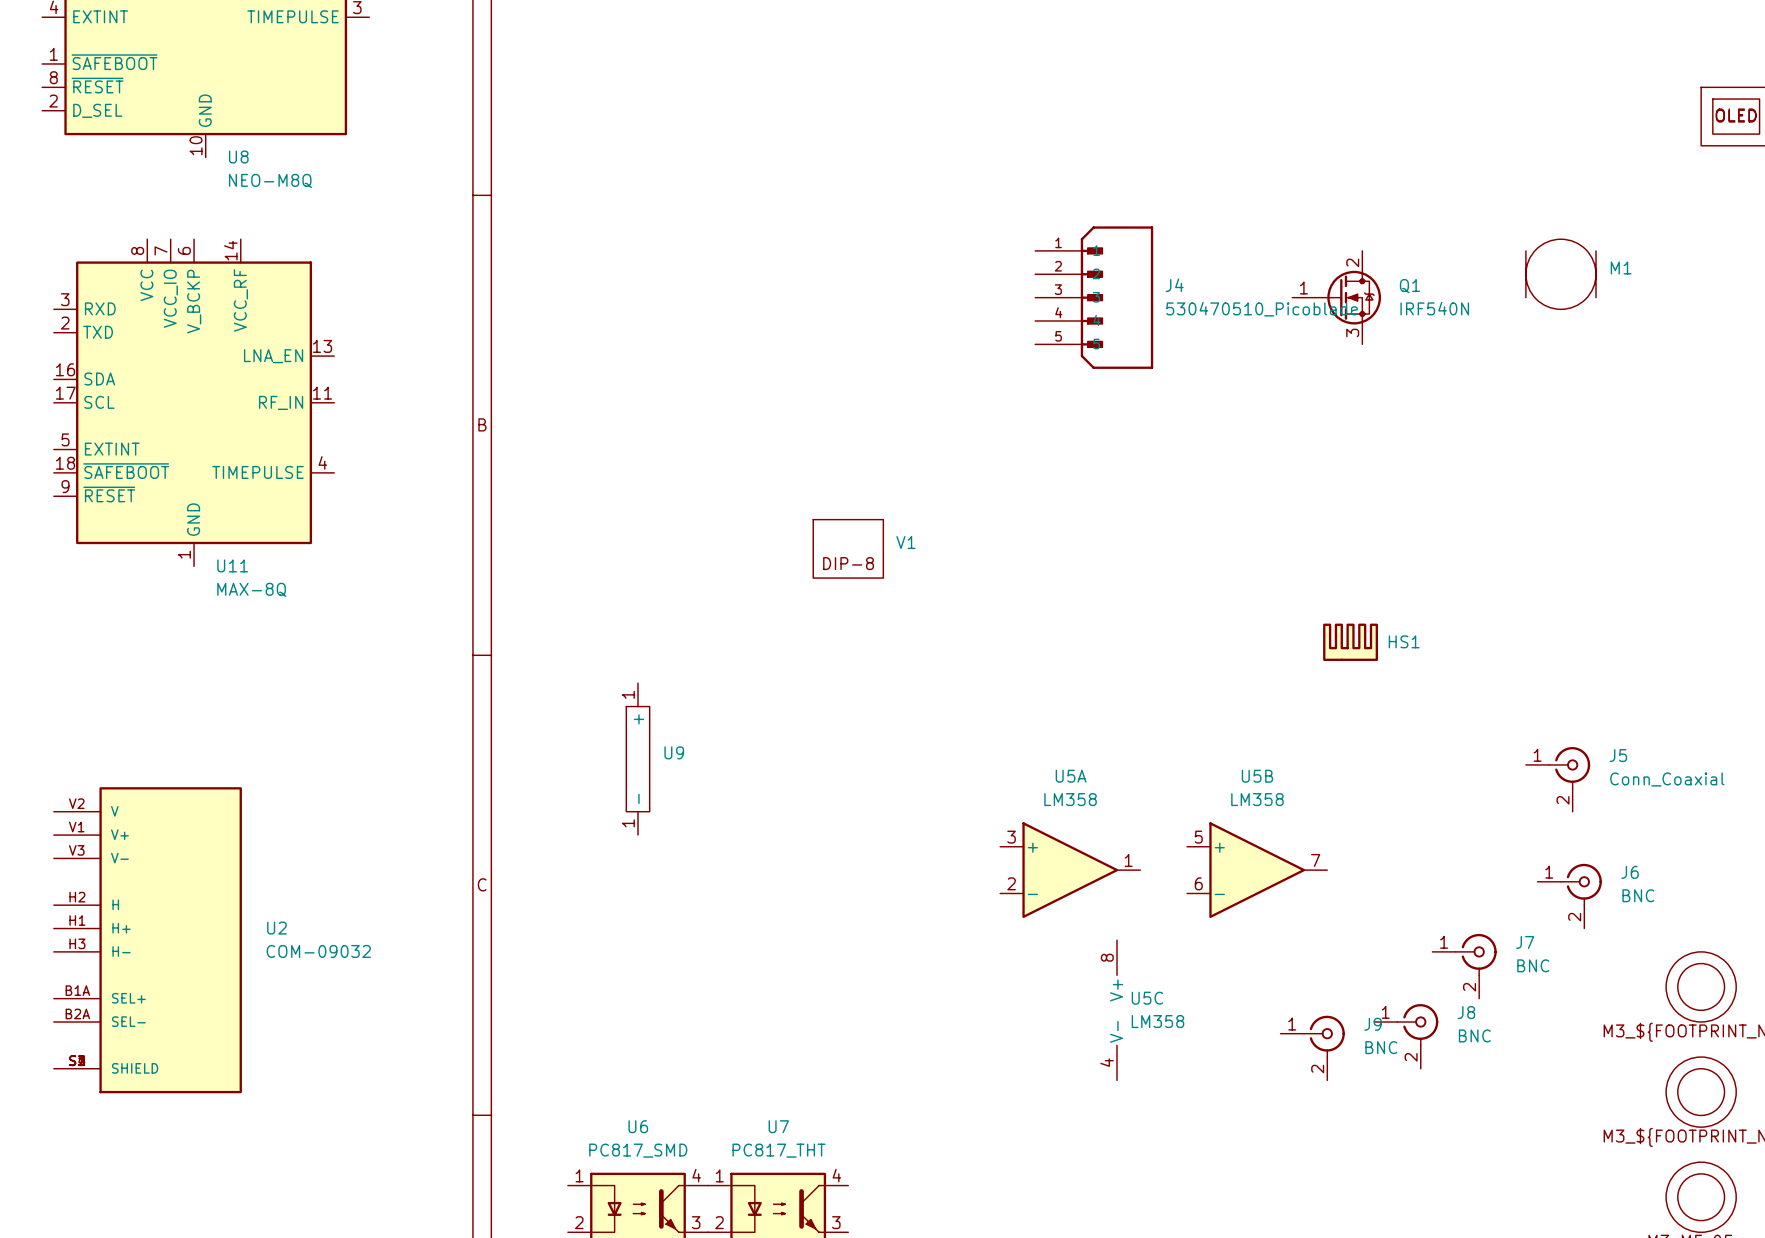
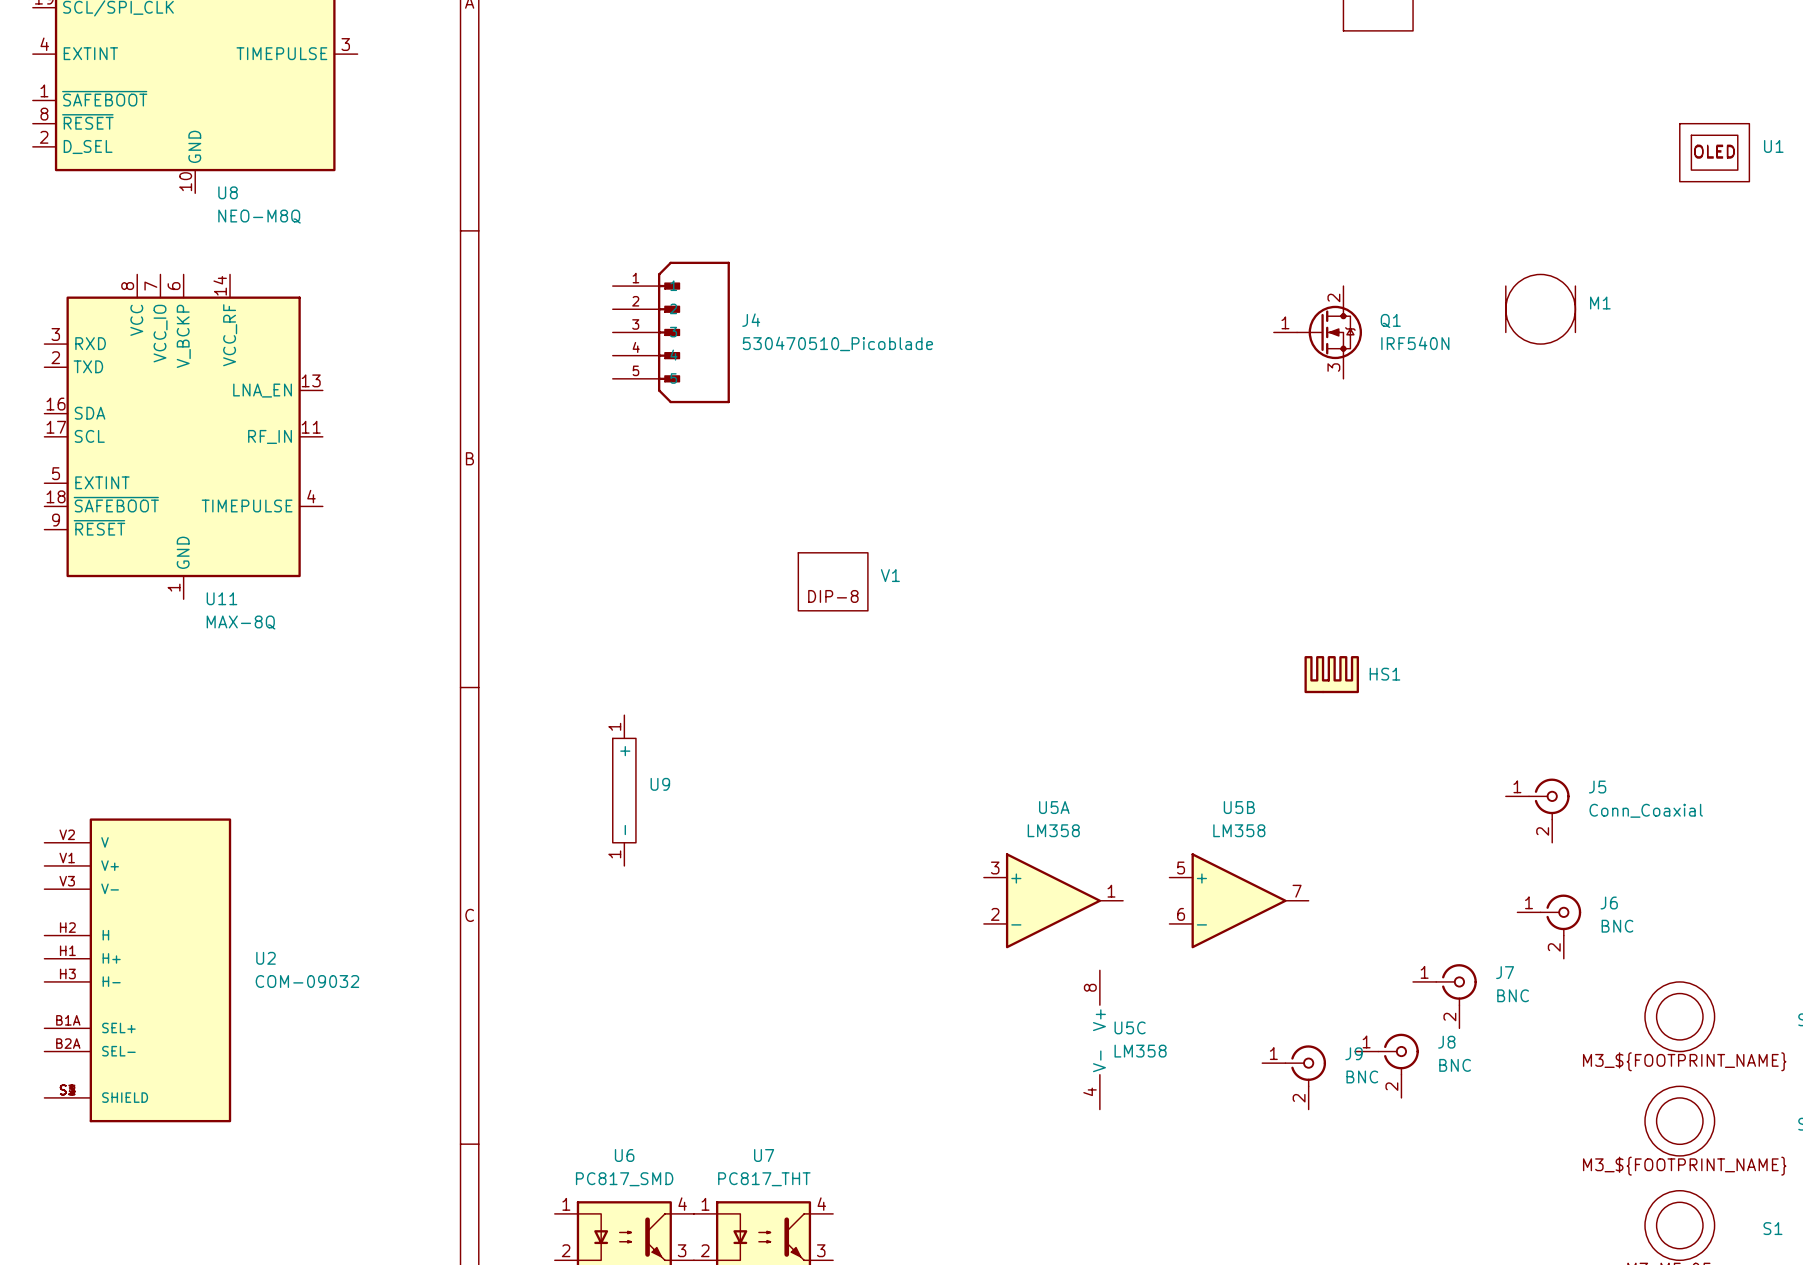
J4 position: (1094, 297) -> (671, 332)

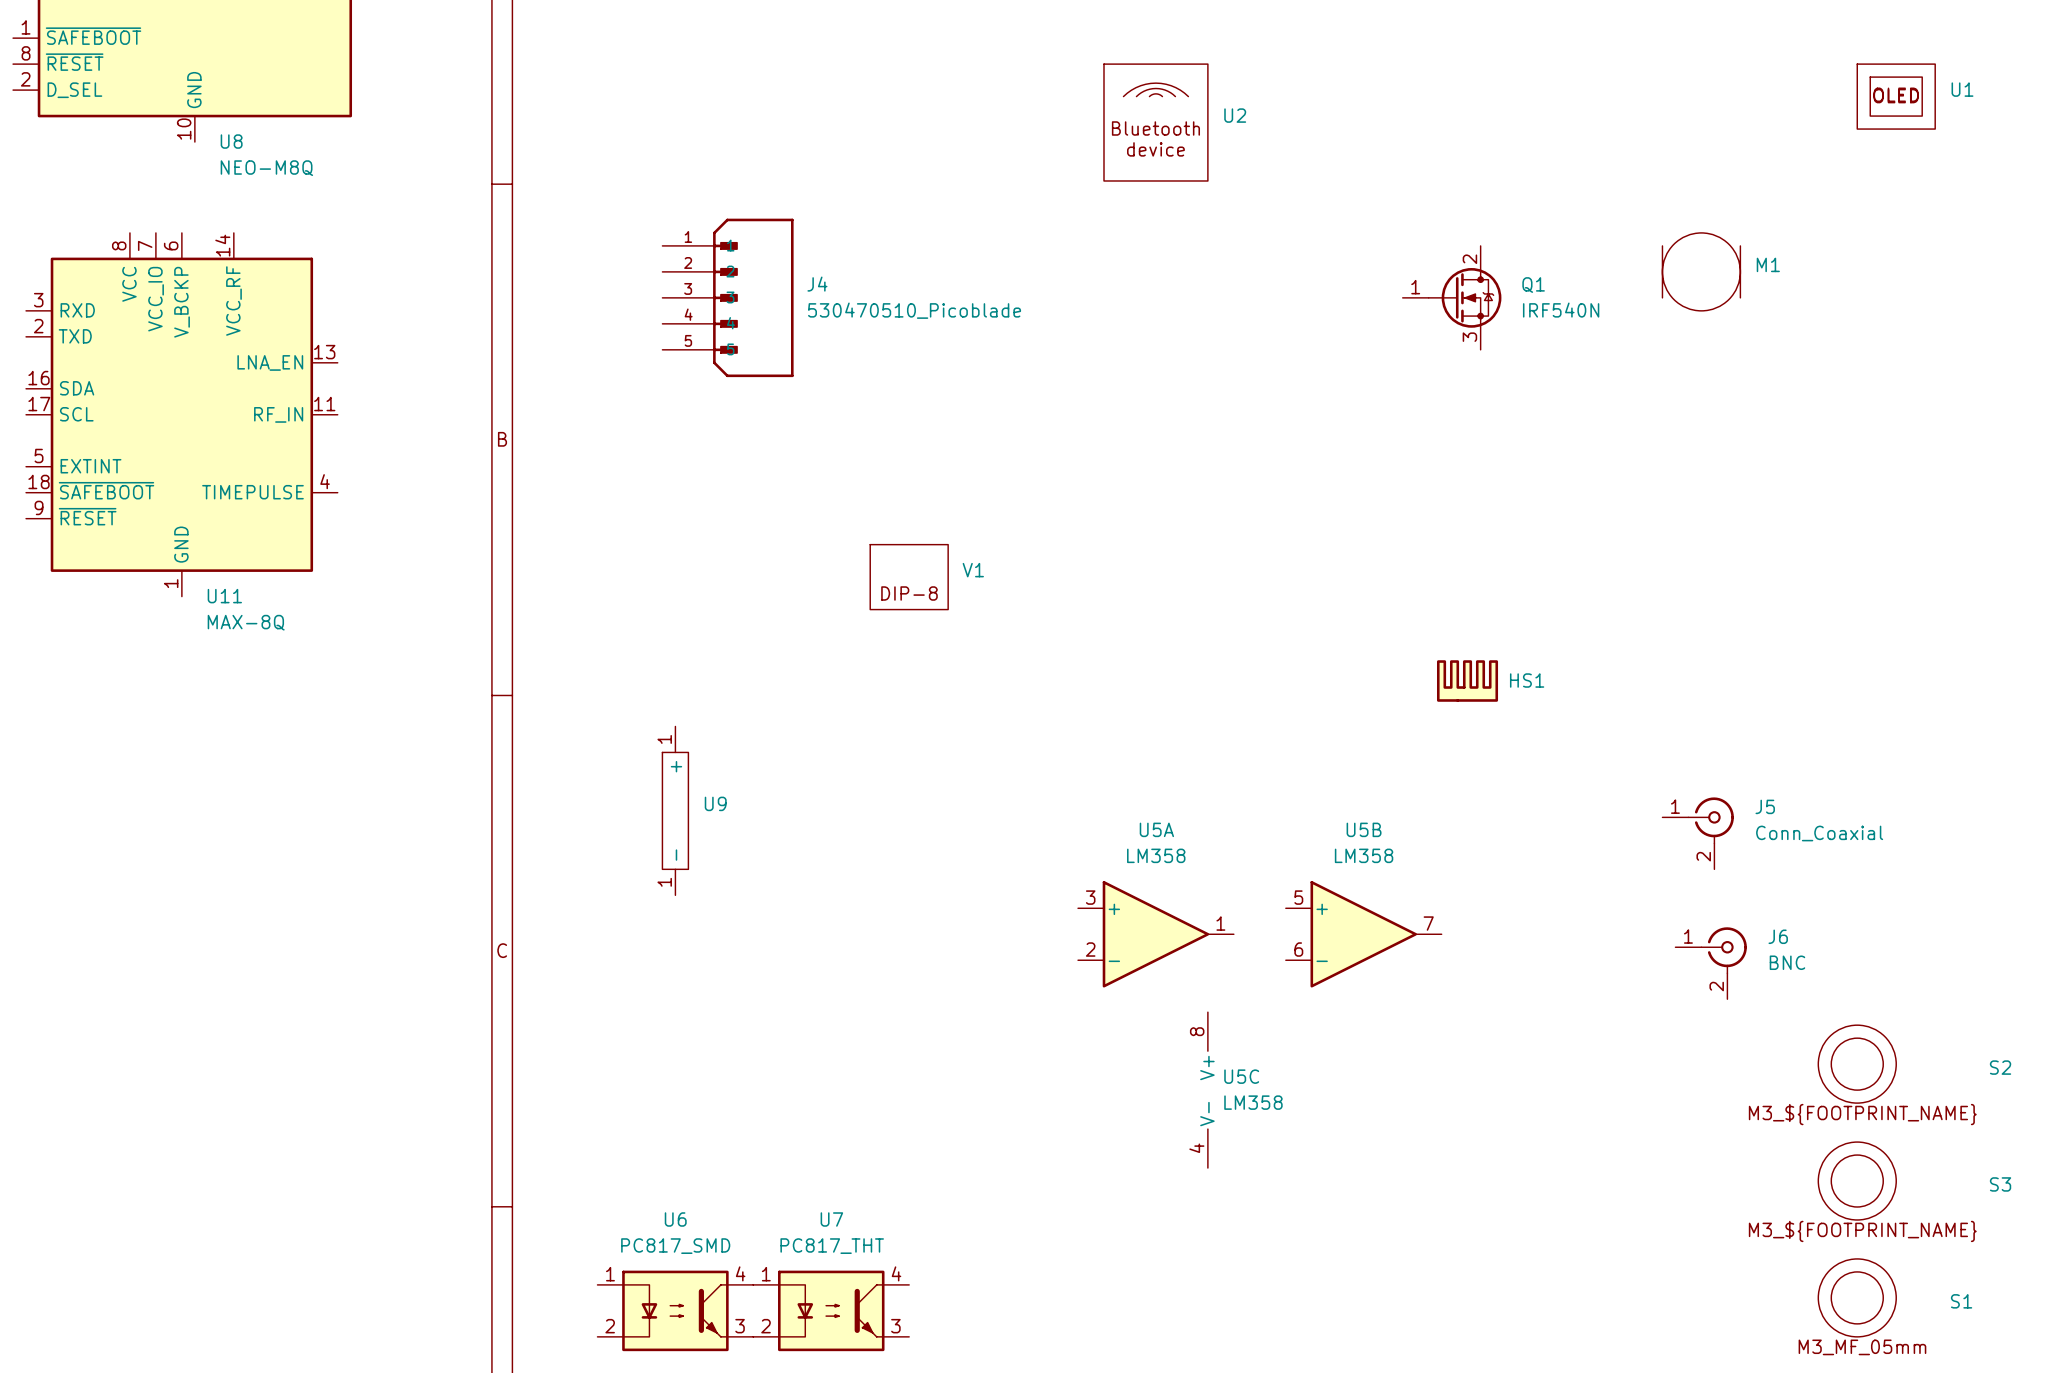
U2 symbol: [44, 818, 232, 1123] -> [1103, 64, 1208, 181]
U2 name position: U2 (266, 958) -> U2 (1235, 115)
U2 value: COM-09032 (307, 981) -> none
J7: BNC (1444, 996) -> none
J8: BNC (1386, 1065) -> none
J9: BNC (1294, 1077) -> none

